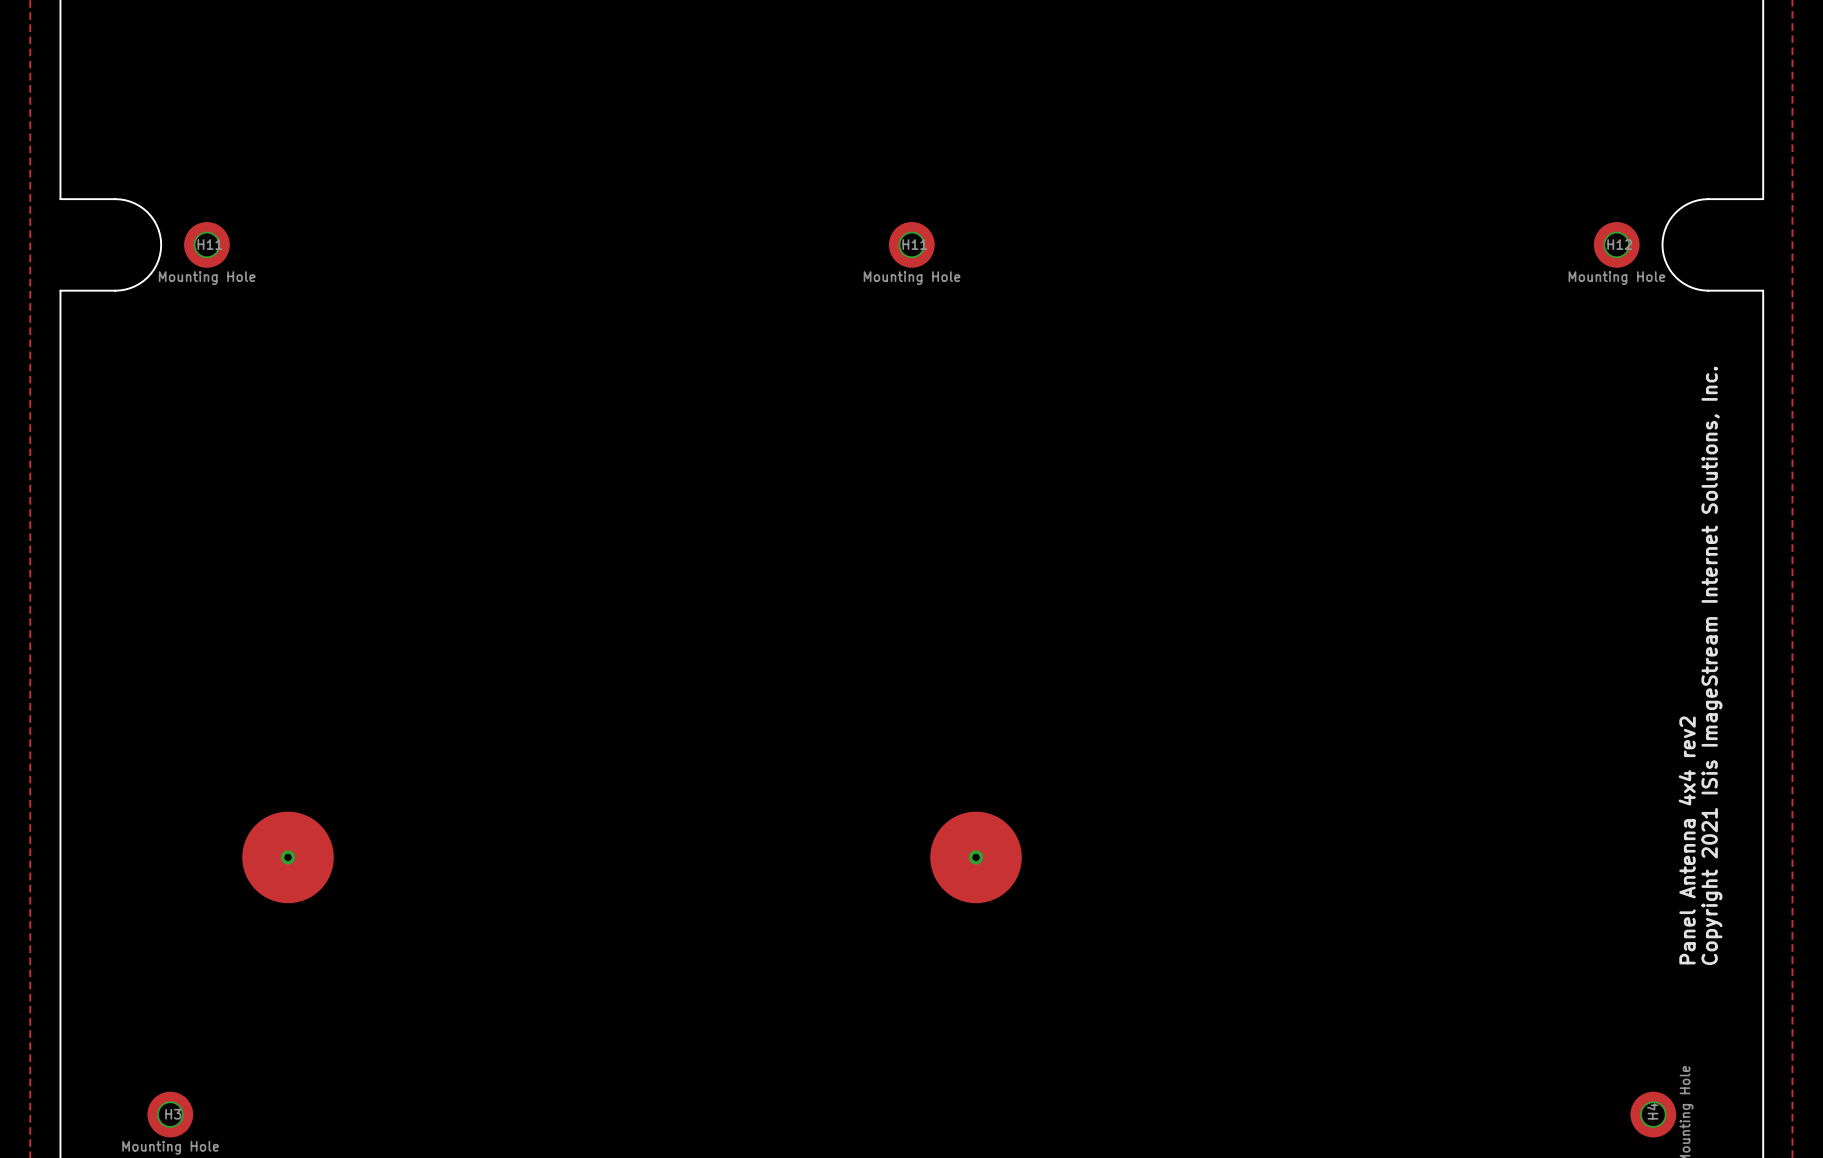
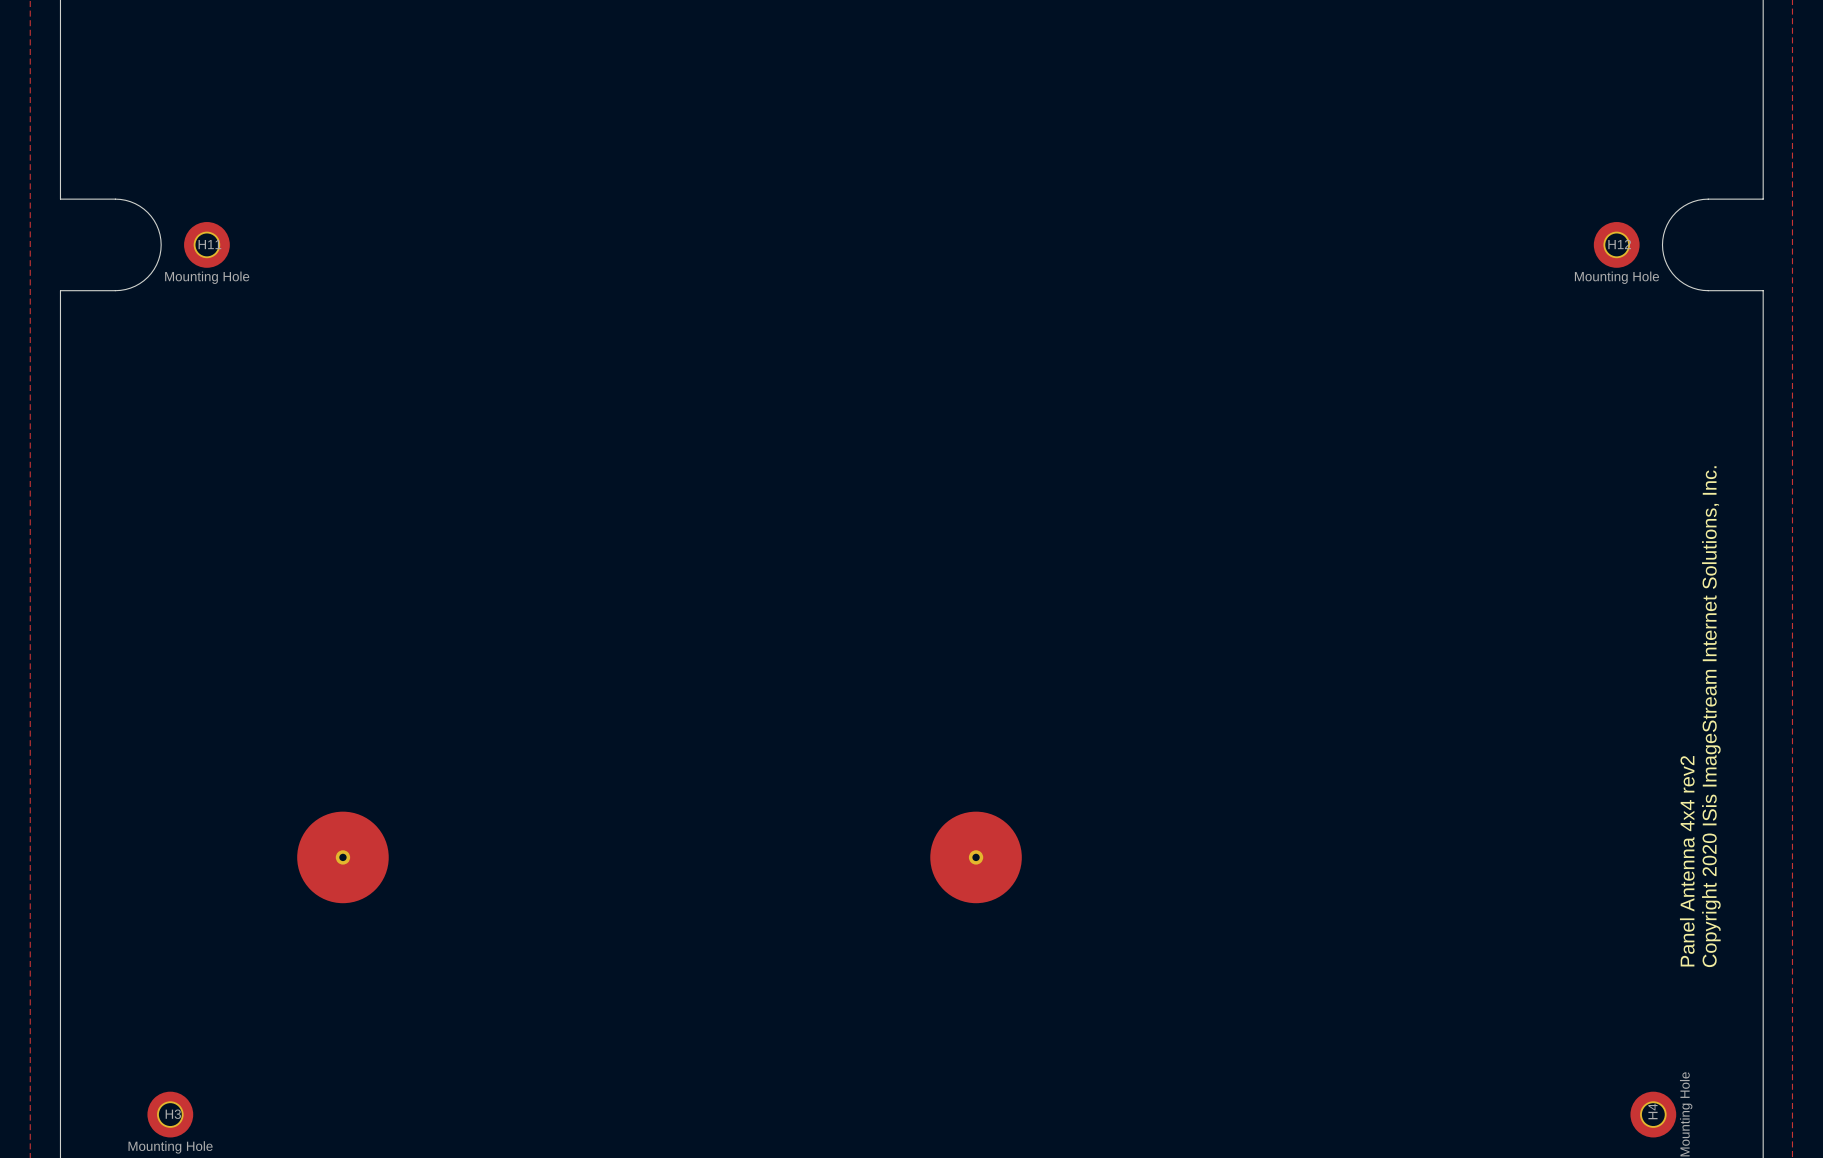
H11: Mounting Hole (911, 244) -> none
text: Copyright 2021 ISis ImageStream Internet Solutions, Inc. (1711, 665) -> Copyright 2020 ISis ImageStream Internet Solutions, Inc. (1711, 716)
part position: (288, 857) -> (342, 857)

